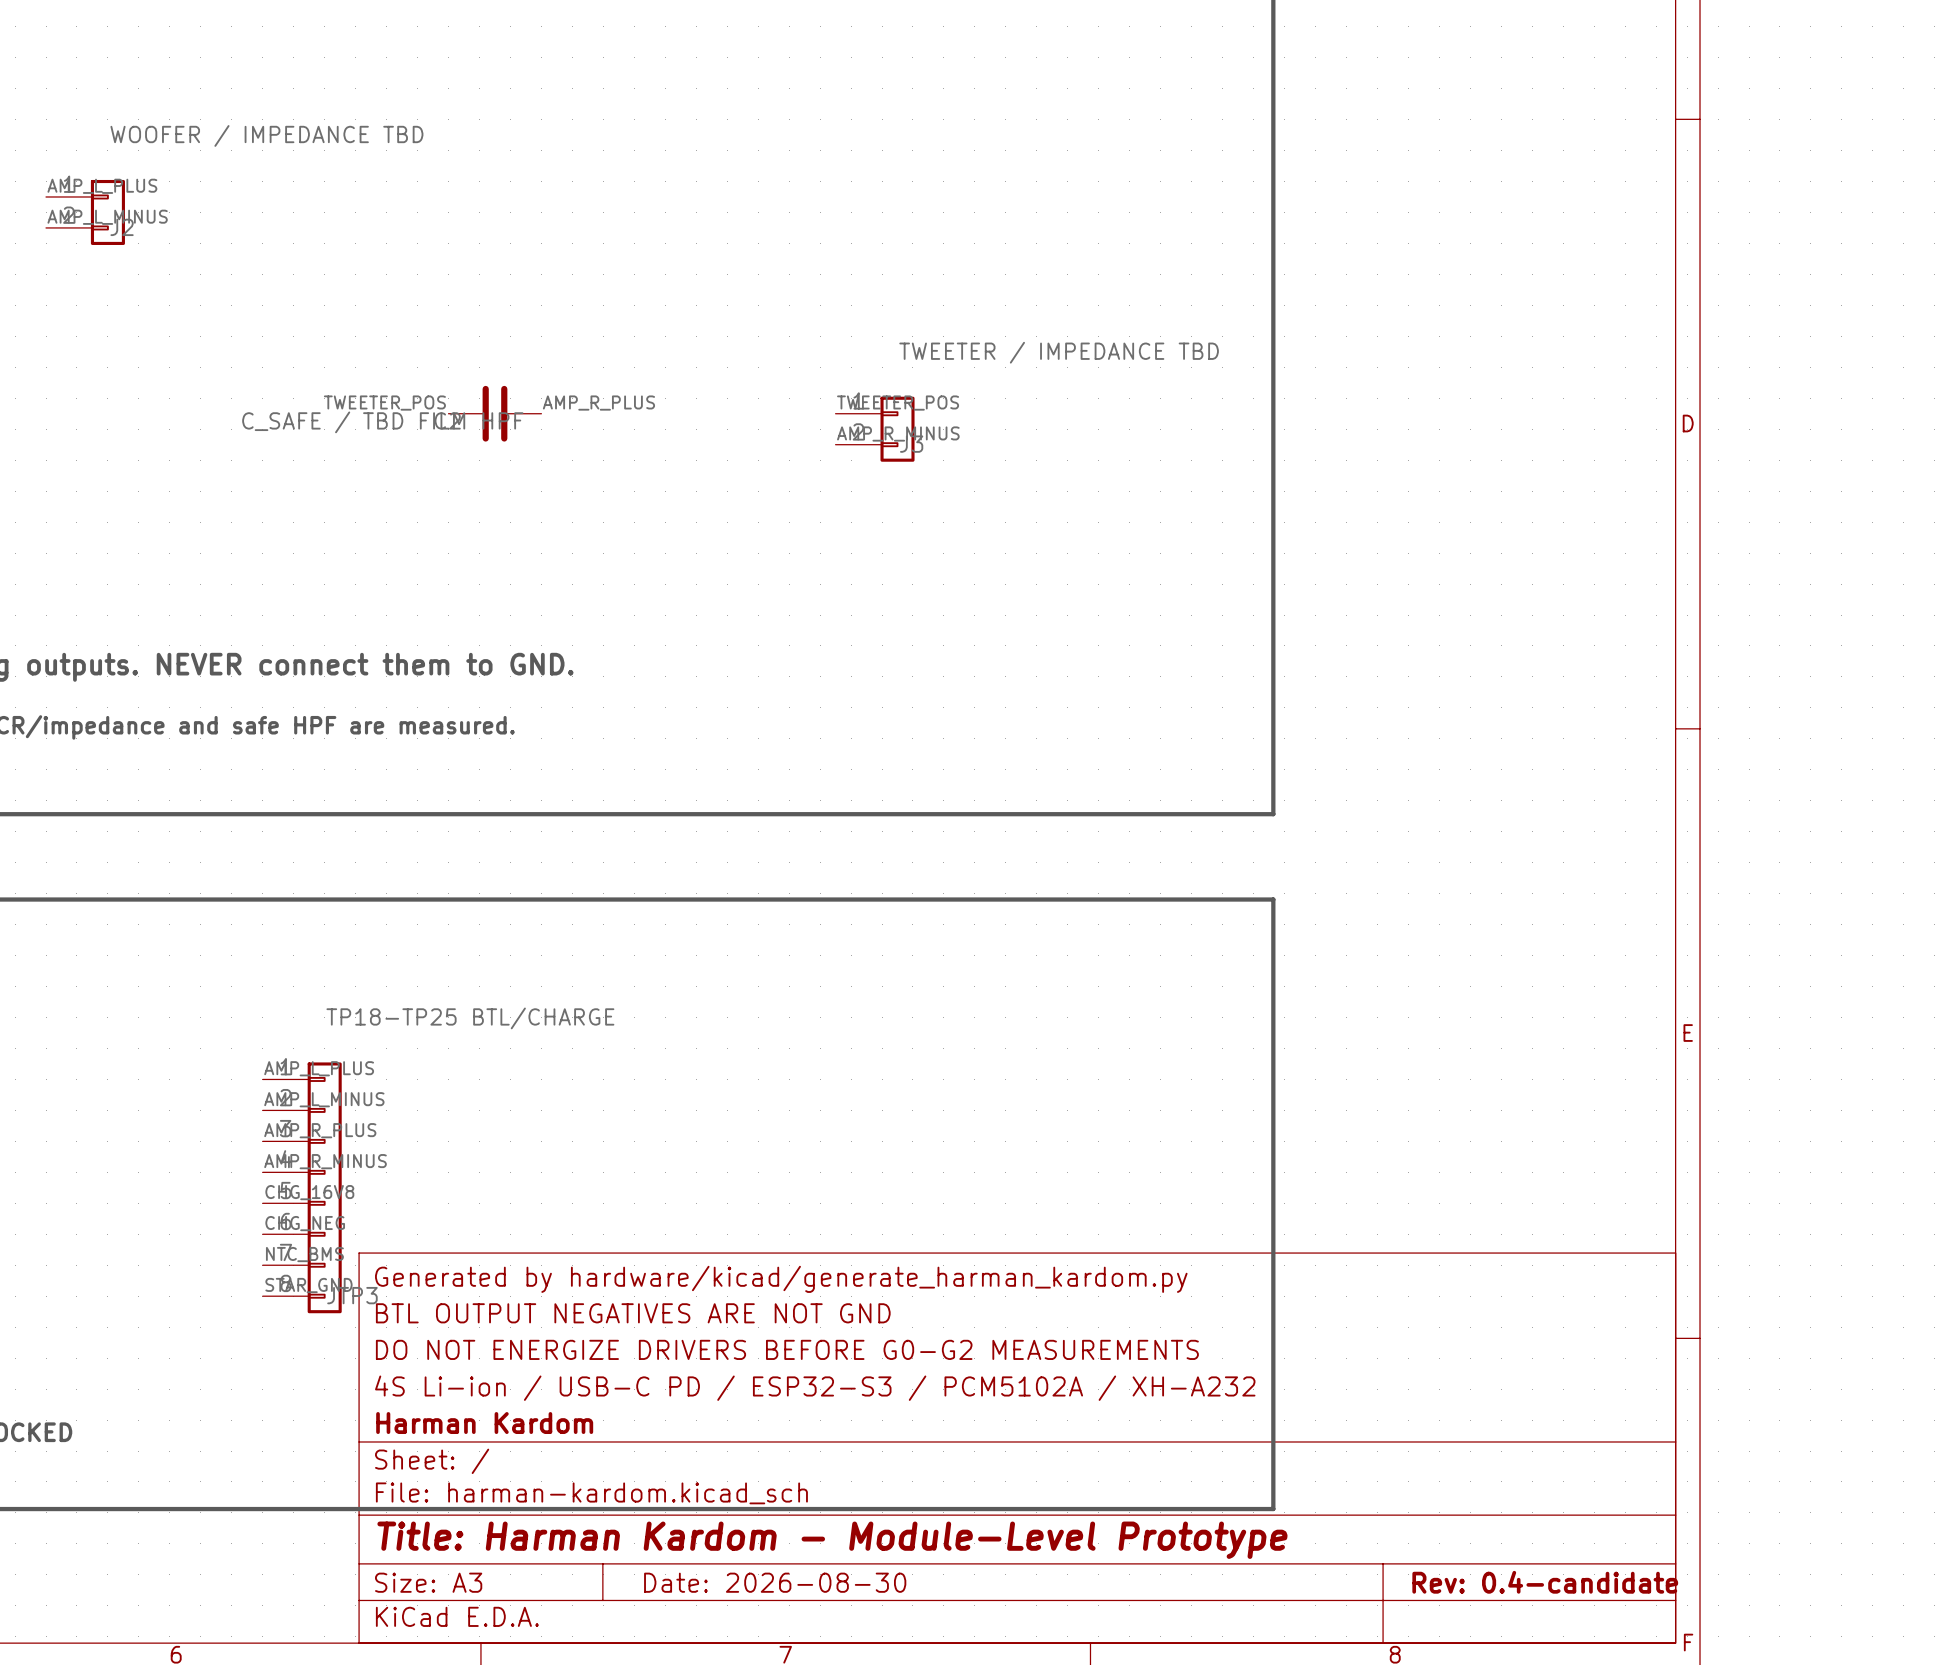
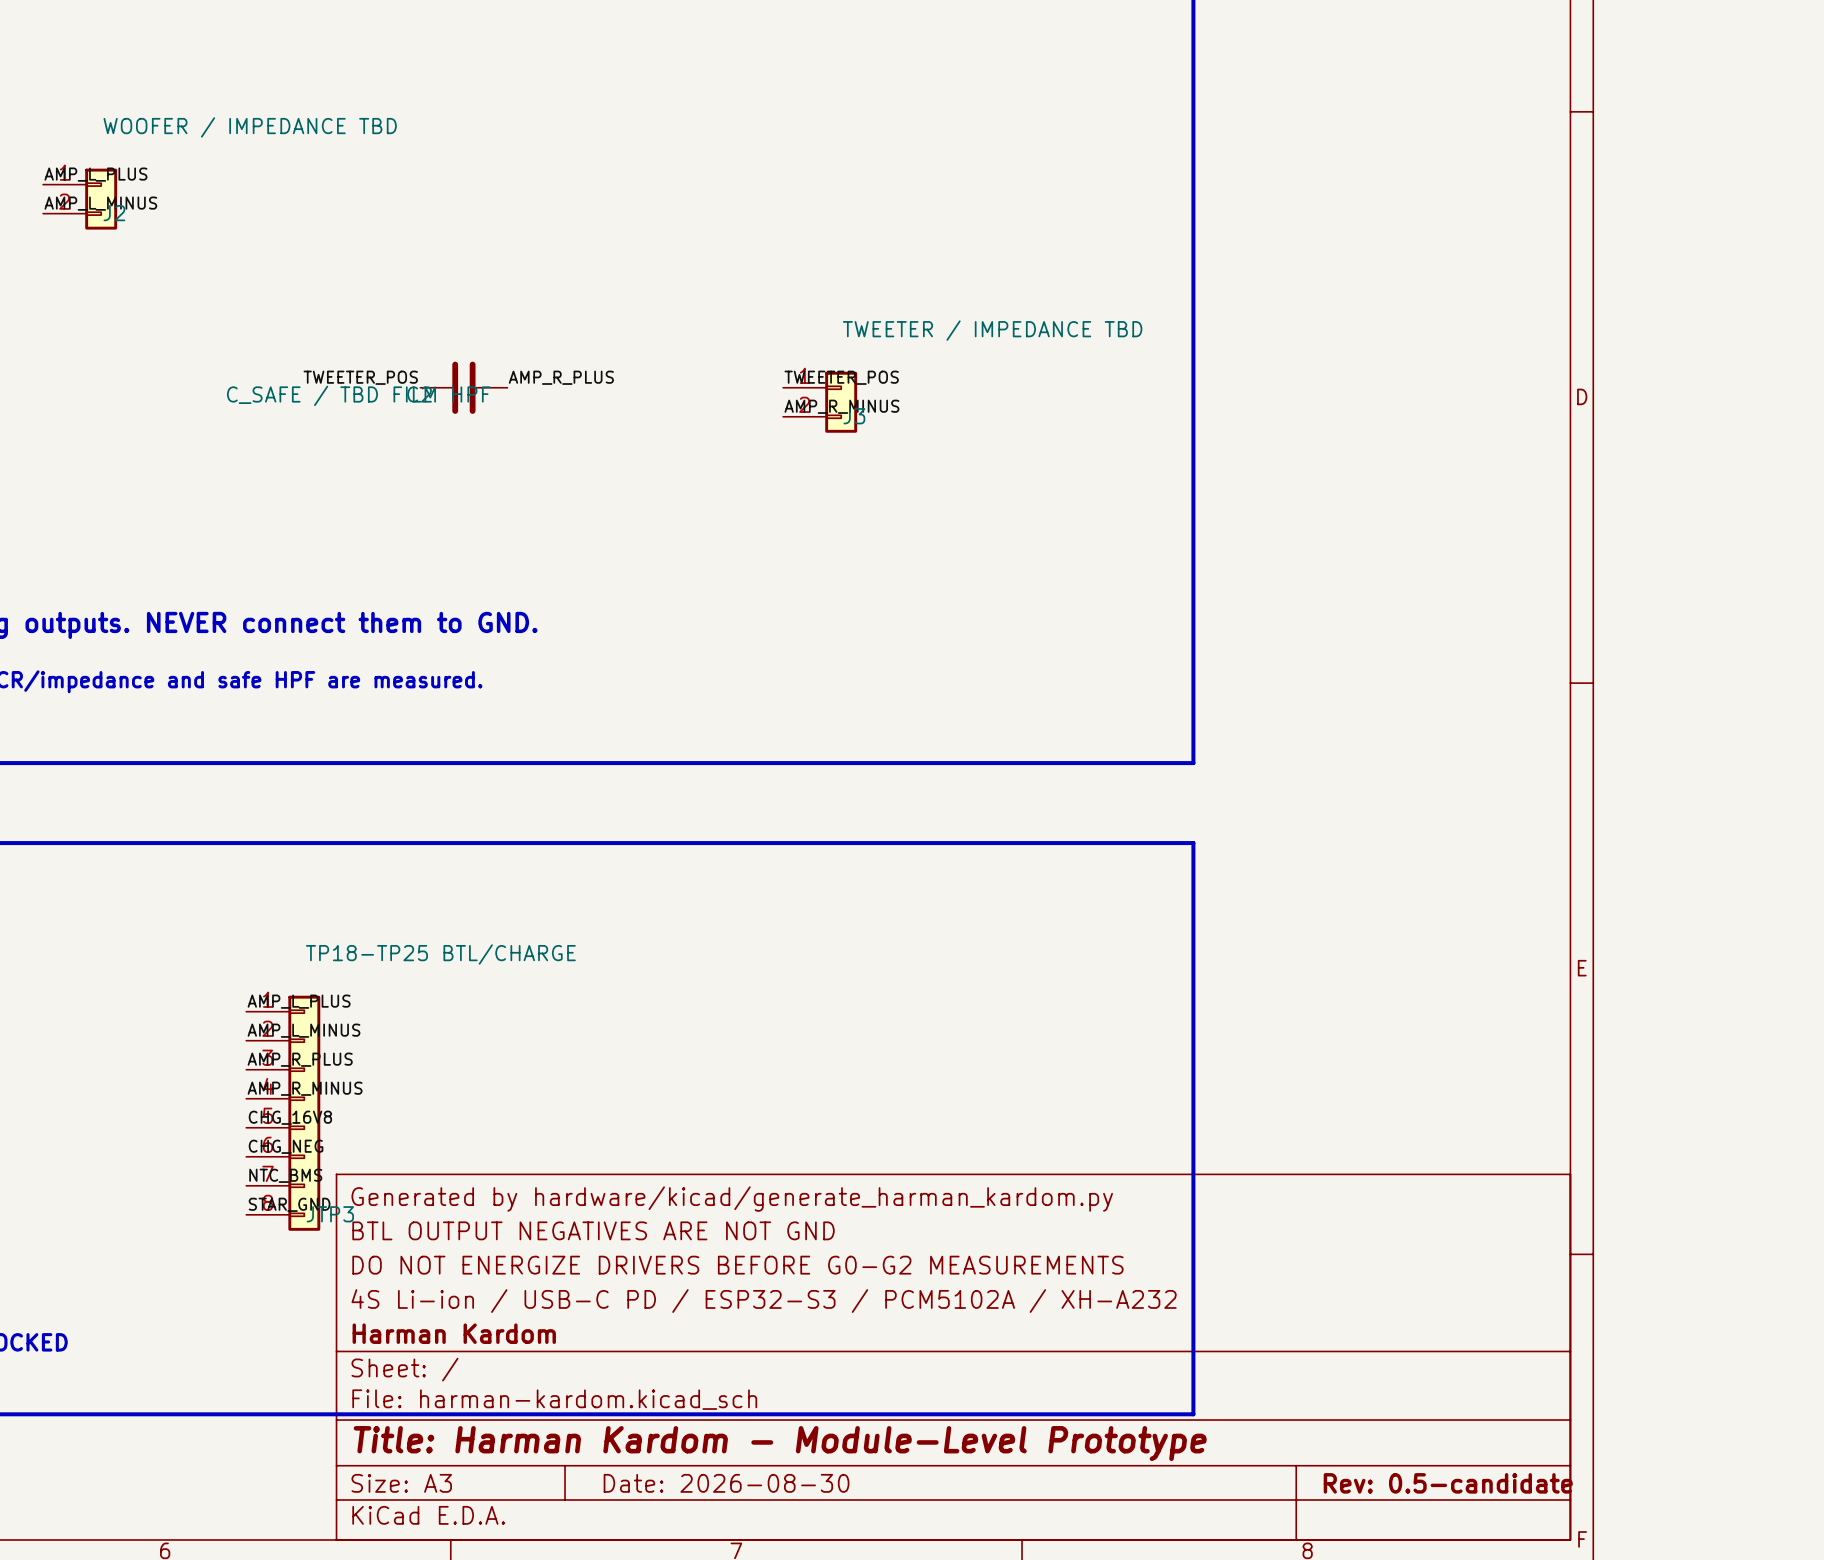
title block: Rev: 0.4-candidate (1545, 1582) -> Rev: 0.5-candidate (1448, 1483)

